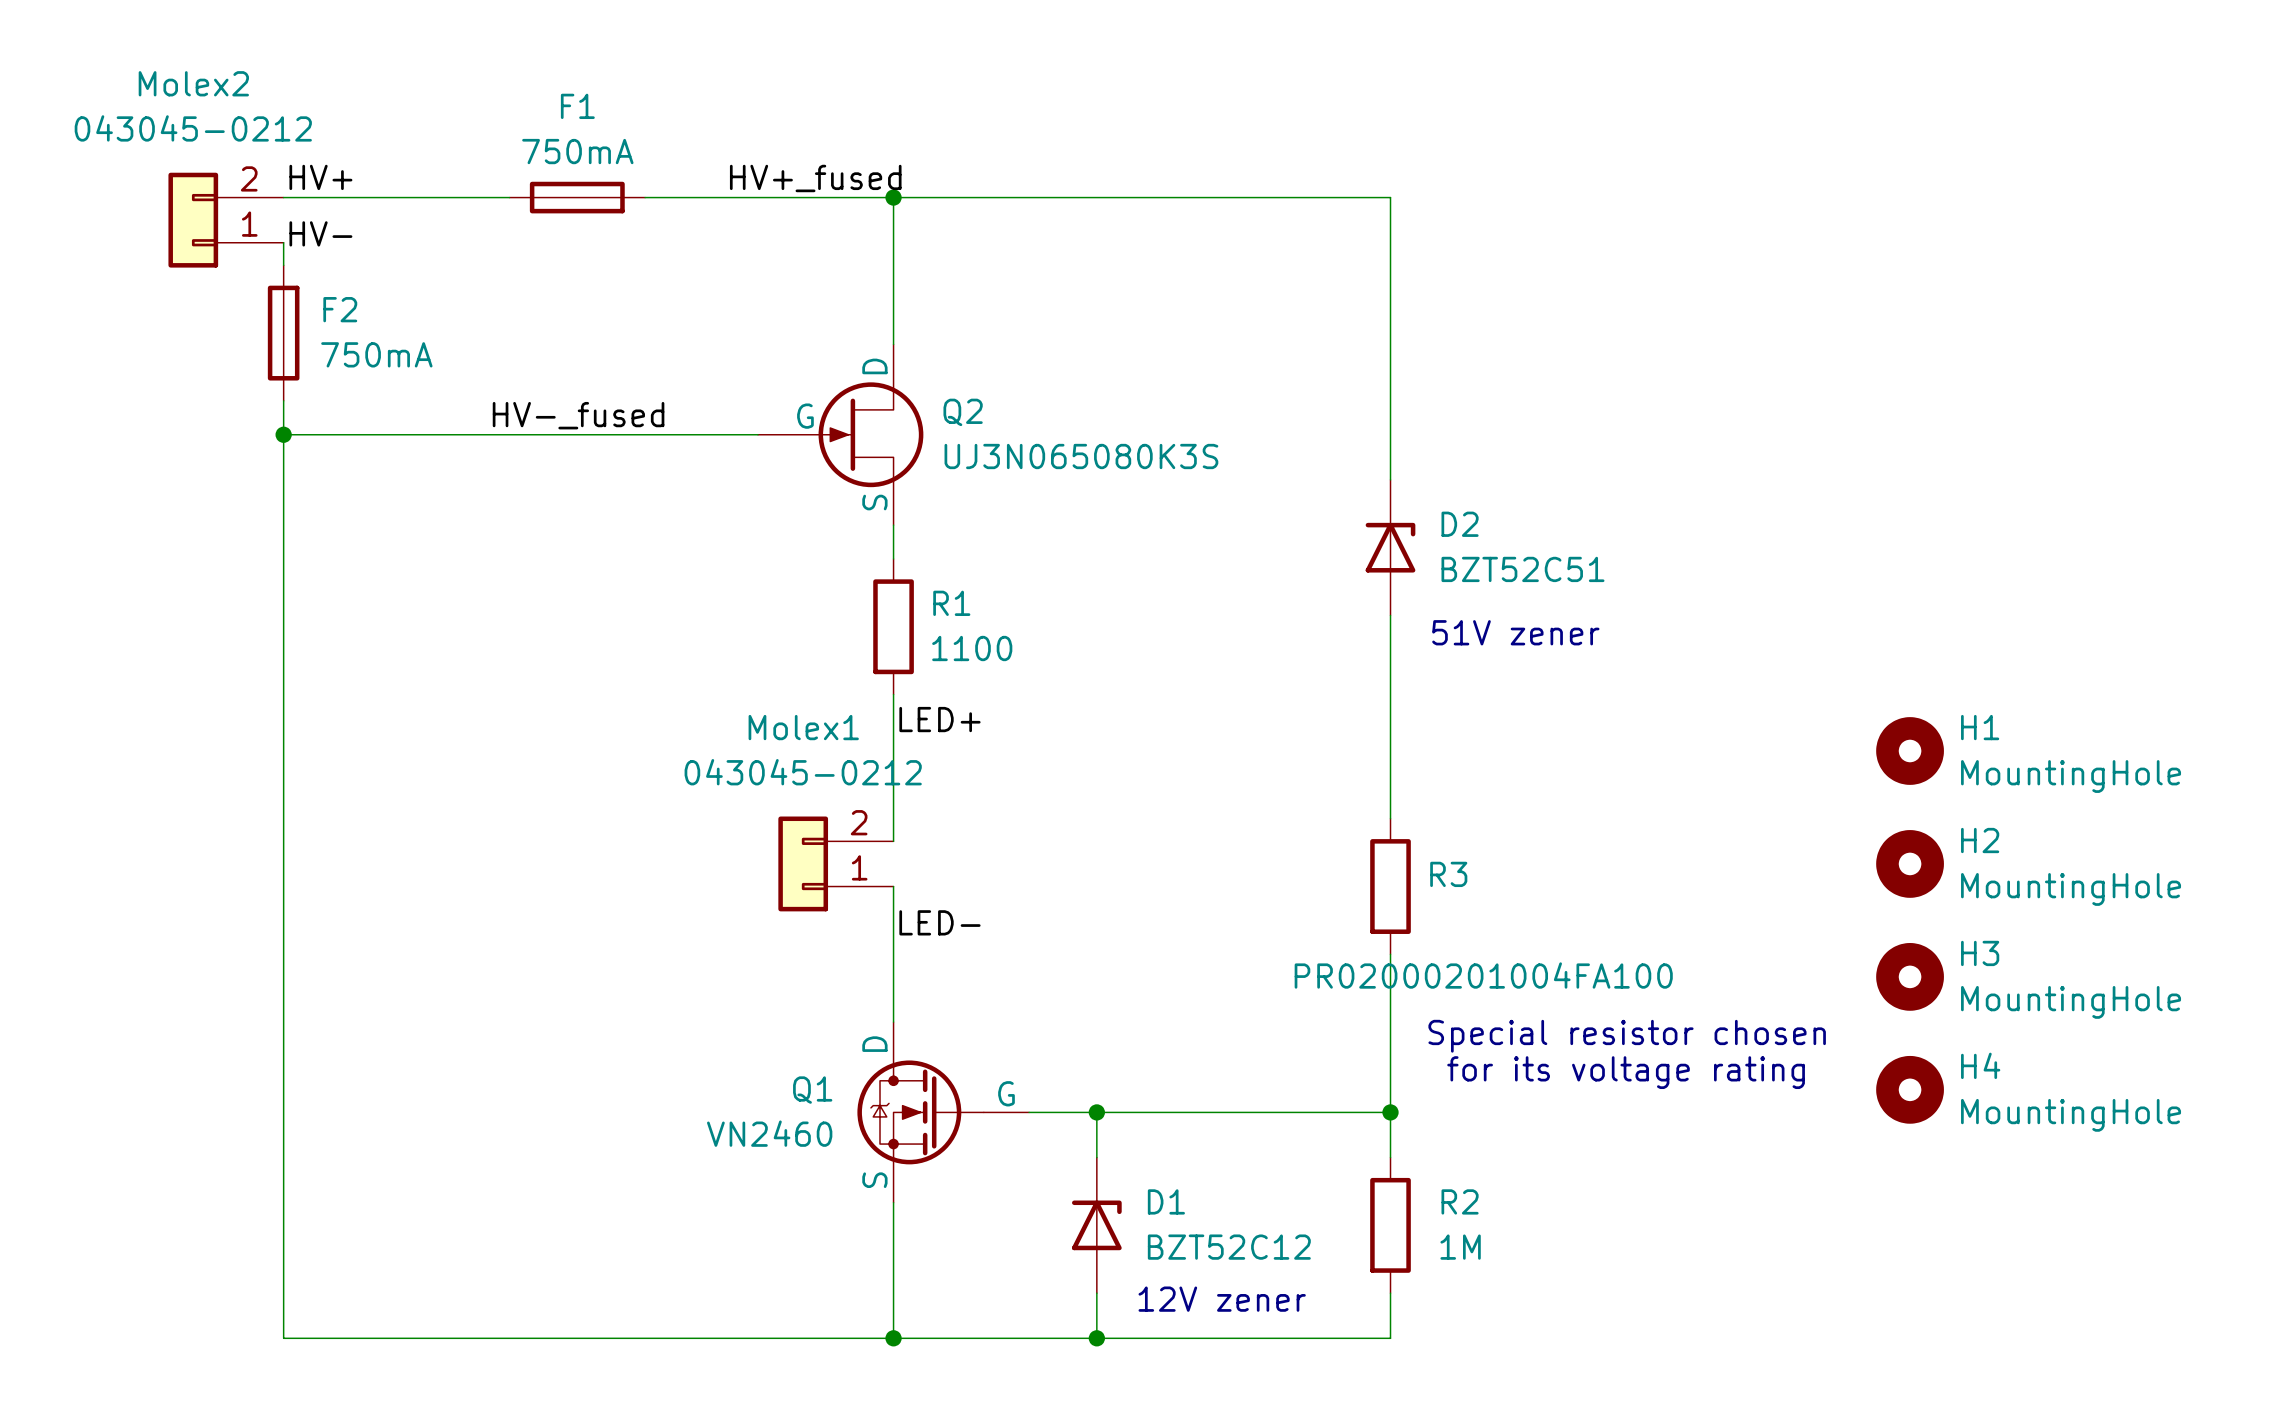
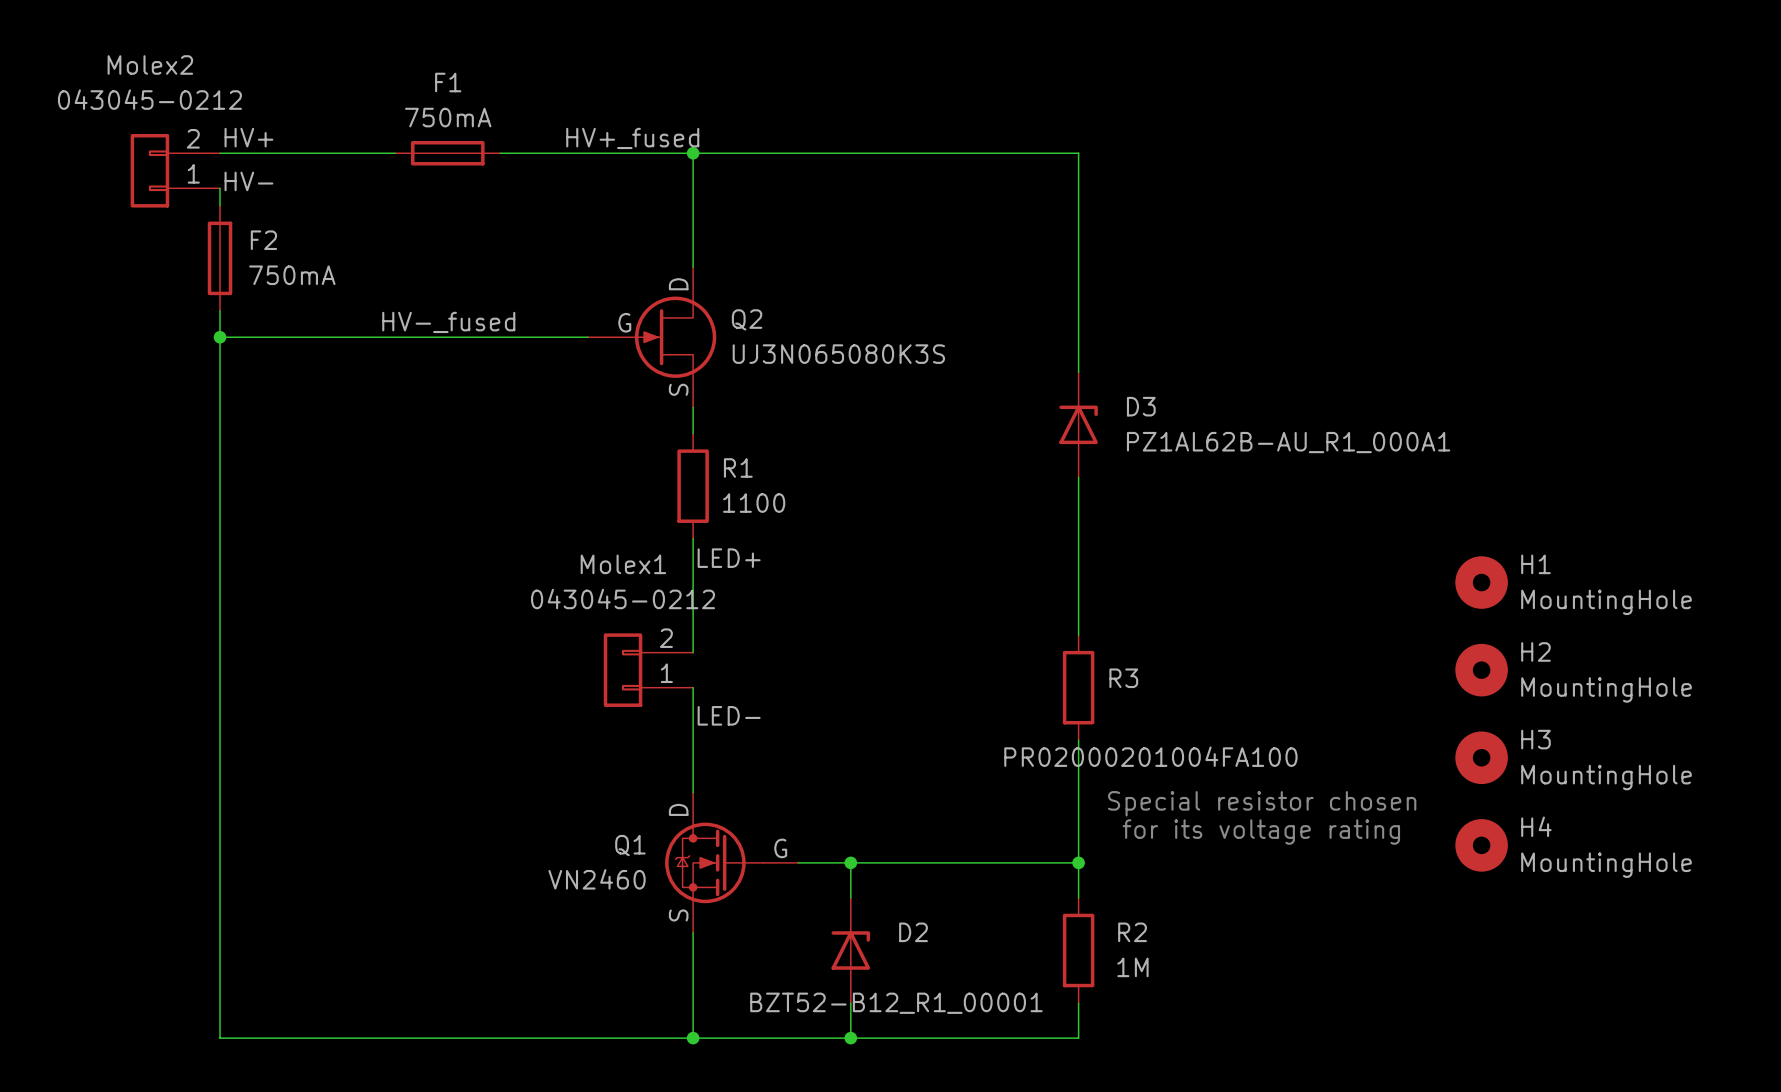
D2 name: D2 (1460, 524) -> D3 (1141, 406)
D2 value: BZT52C51 (1522, 569) -> PZ1AL62B-AU_R1_000A1 (1288, 442)
text: 51V zener (1515, 632) -> none
D1 name: D1 (1166, 1201) -> D2 (913, 932)
D1 value: BZT52C12 (1229, 1247) -> BZT52-B12_R1_00001 (896, 1003)
text: 12V zener (1222, 1299) -> none

